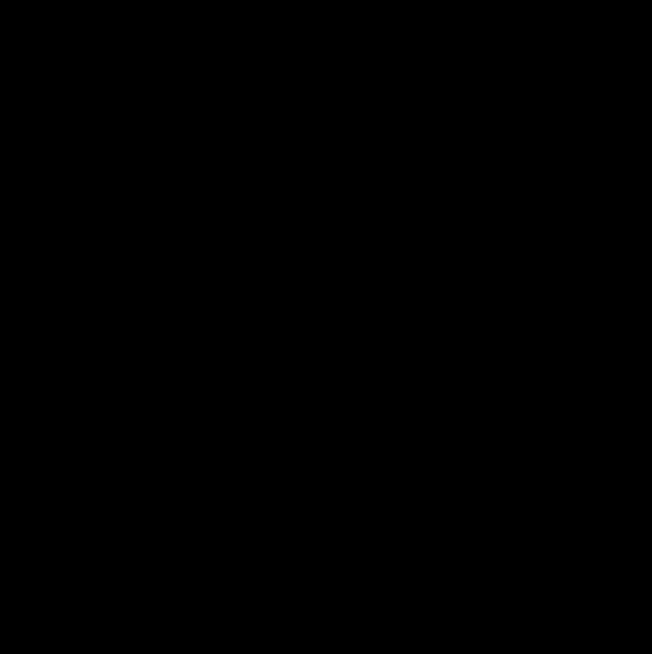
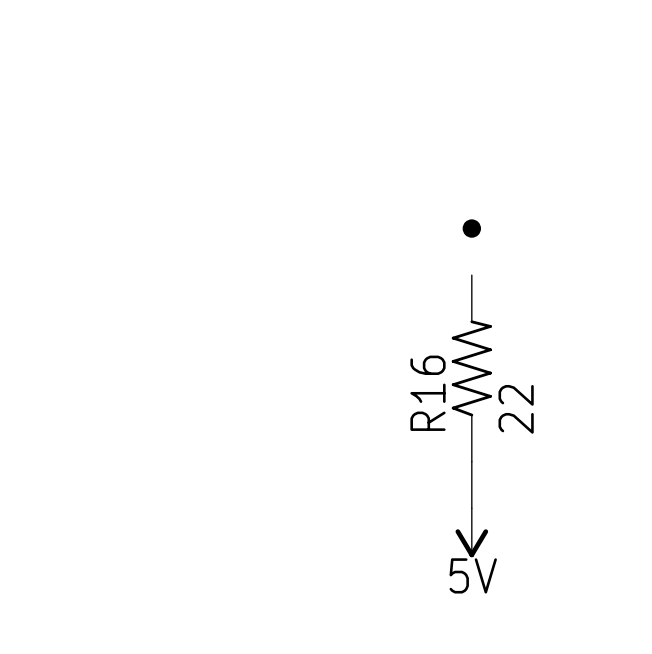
junction: none -> (471, 228)
R16: none -> 22 (471, 368)
wire: none -> (471, 461) (471, 508)
power symbol: none -> 5V (471, 532)

